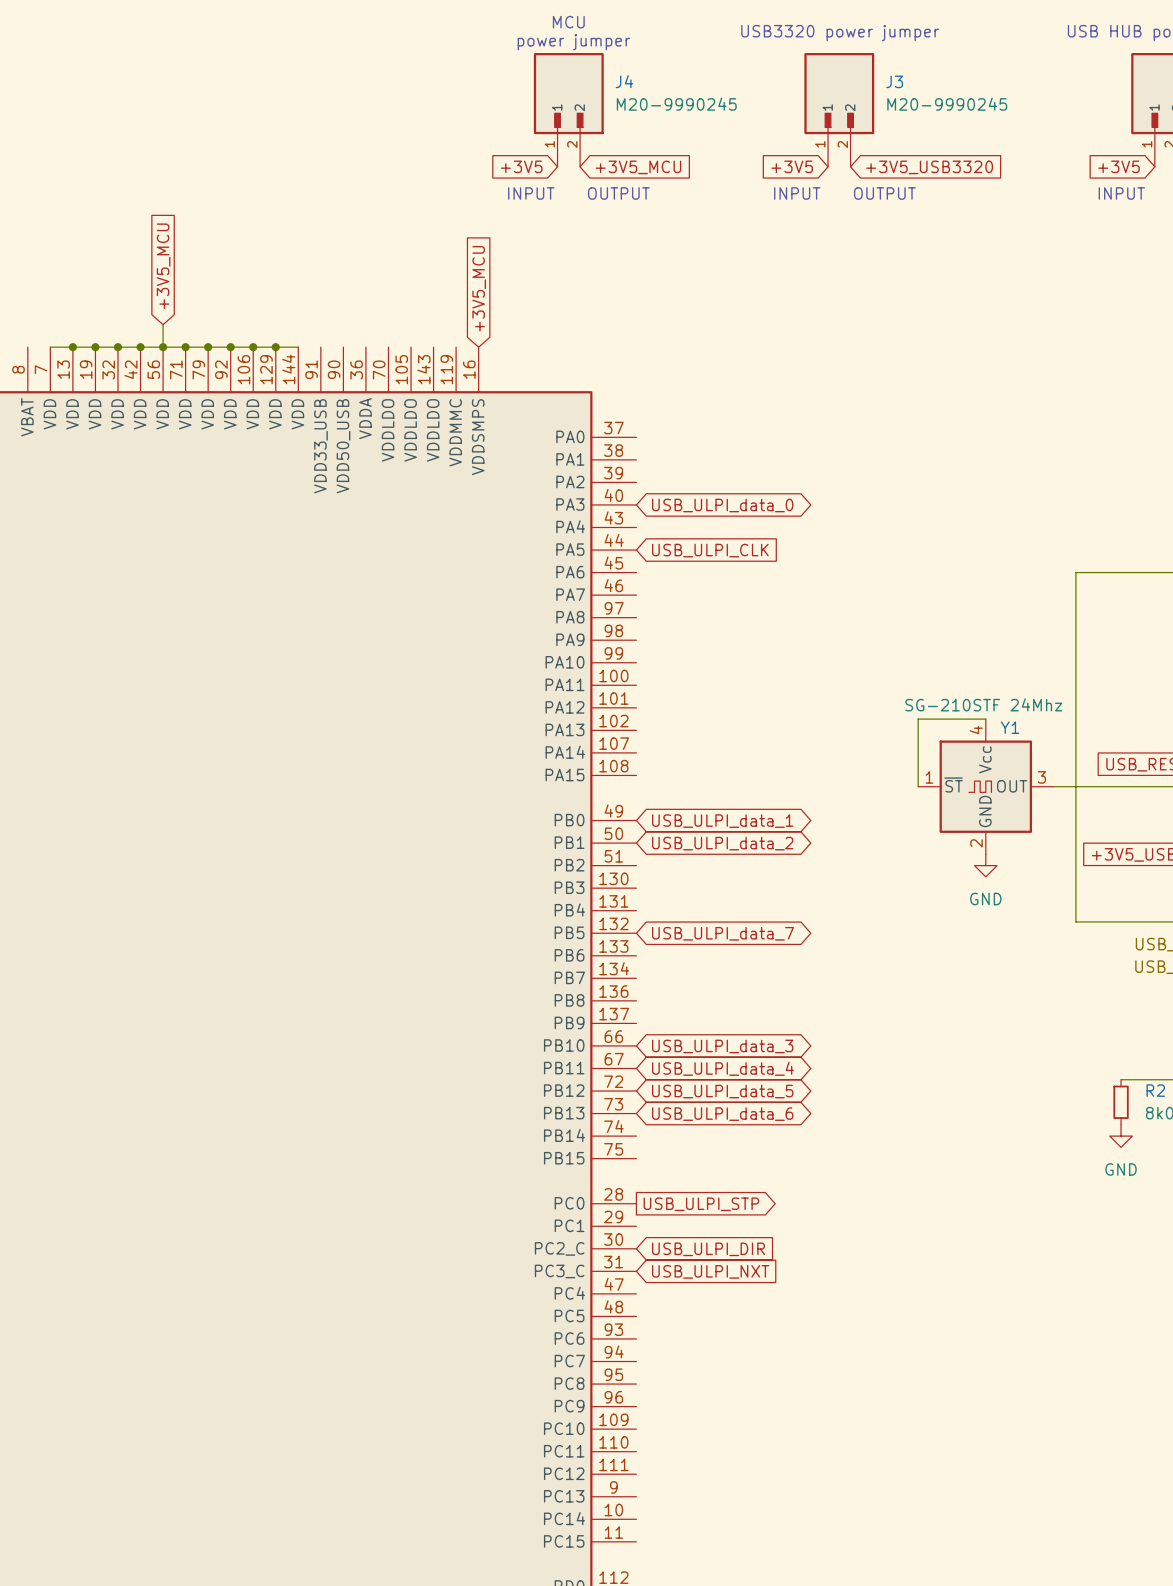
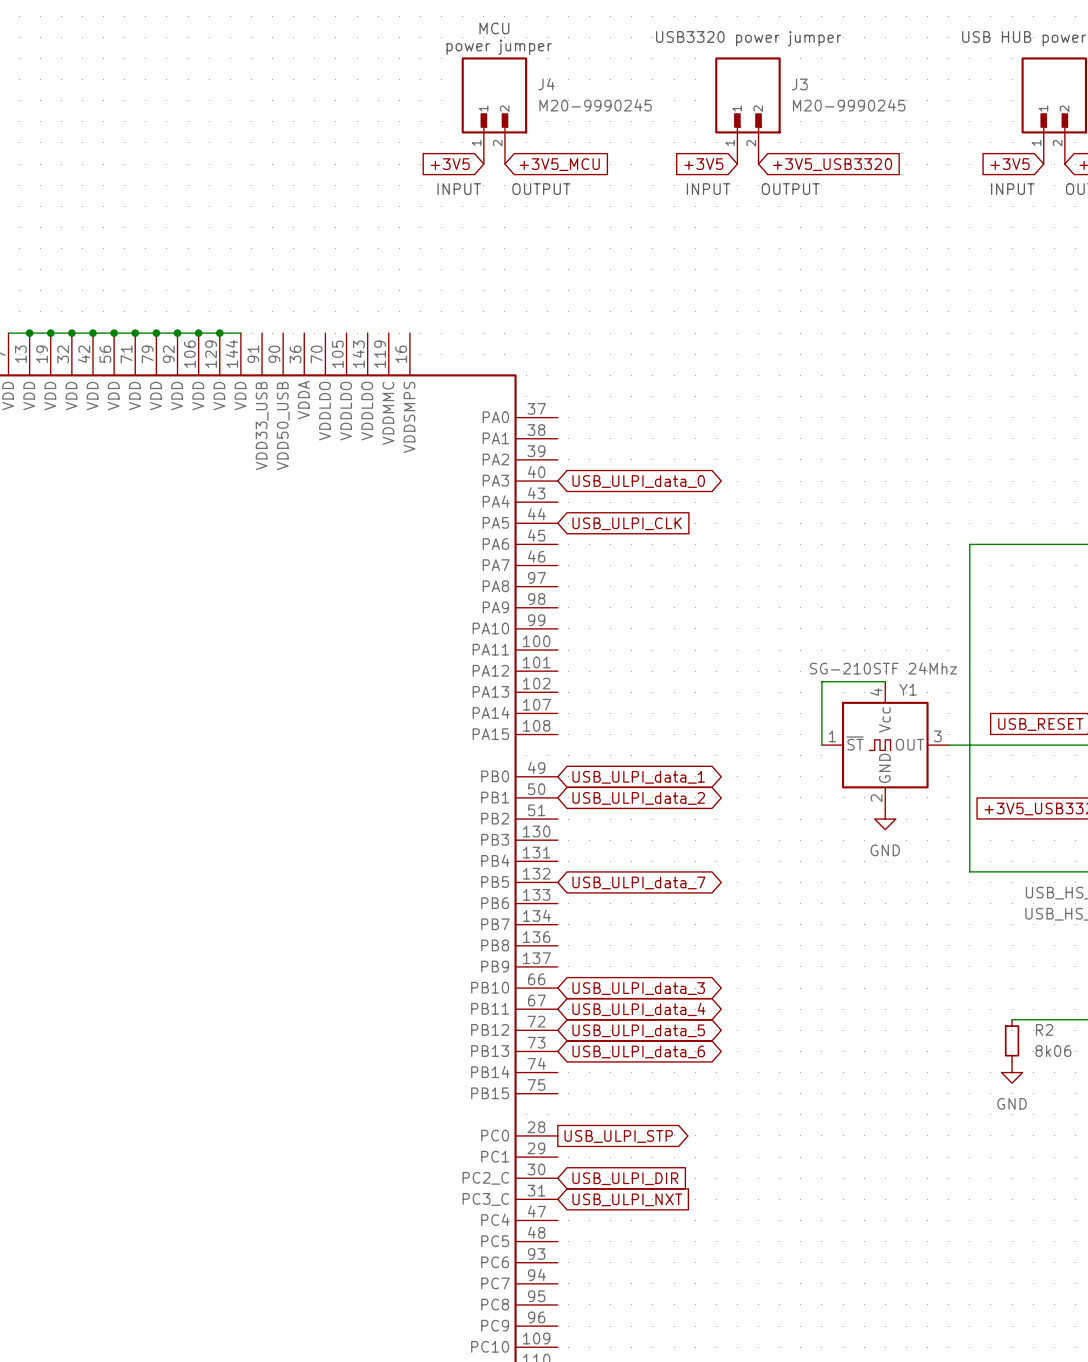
global label: +3V5_MCU (163, 266) -> none
global label: +3V5_MCU (479, 288) -> none
wire: (163, 324) (163, 347) -> none

